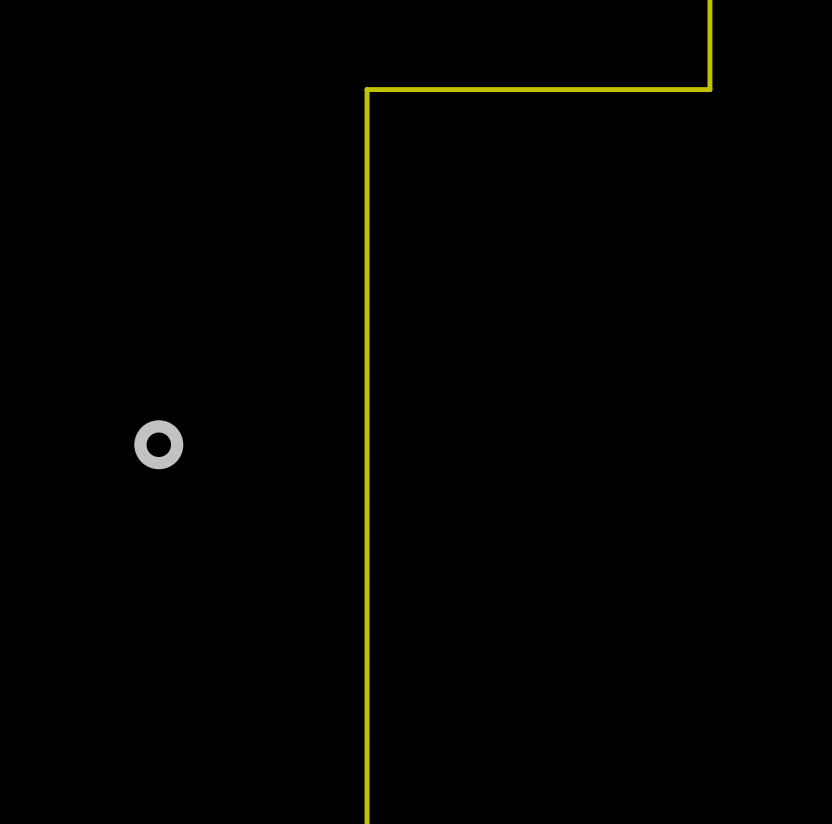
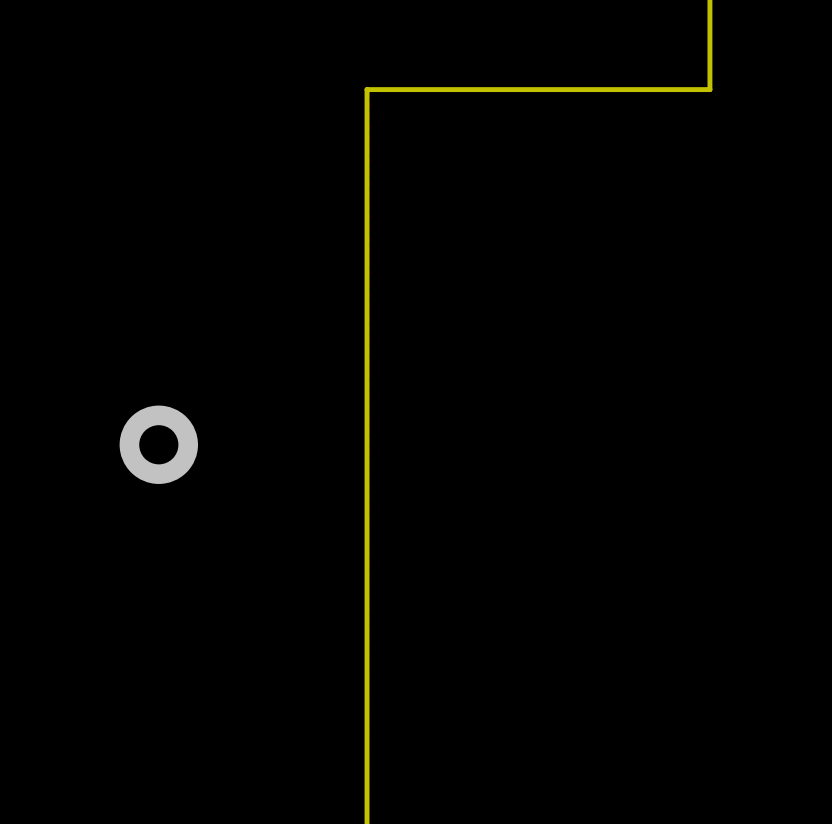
via size: [134, 420, 184, 470] -> [119, 405, 199, 484]

